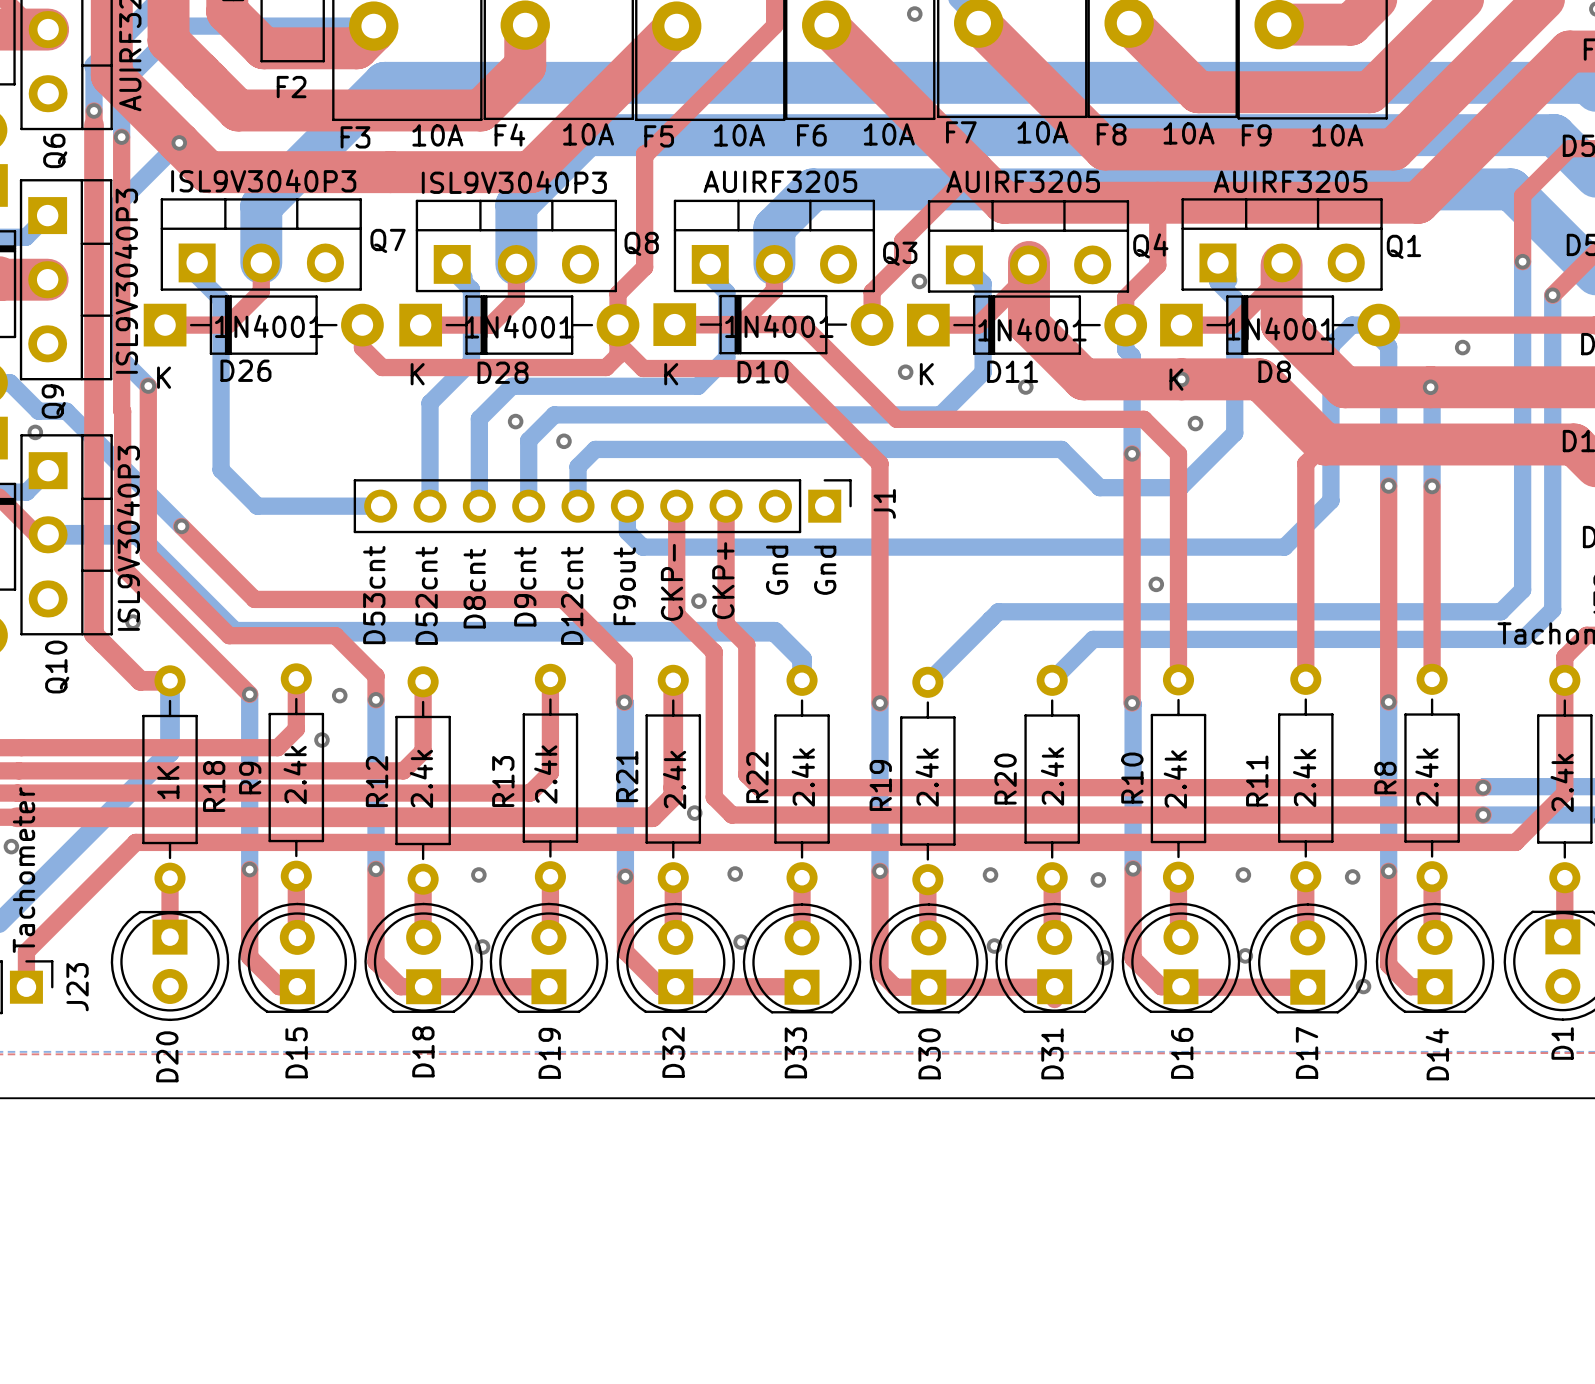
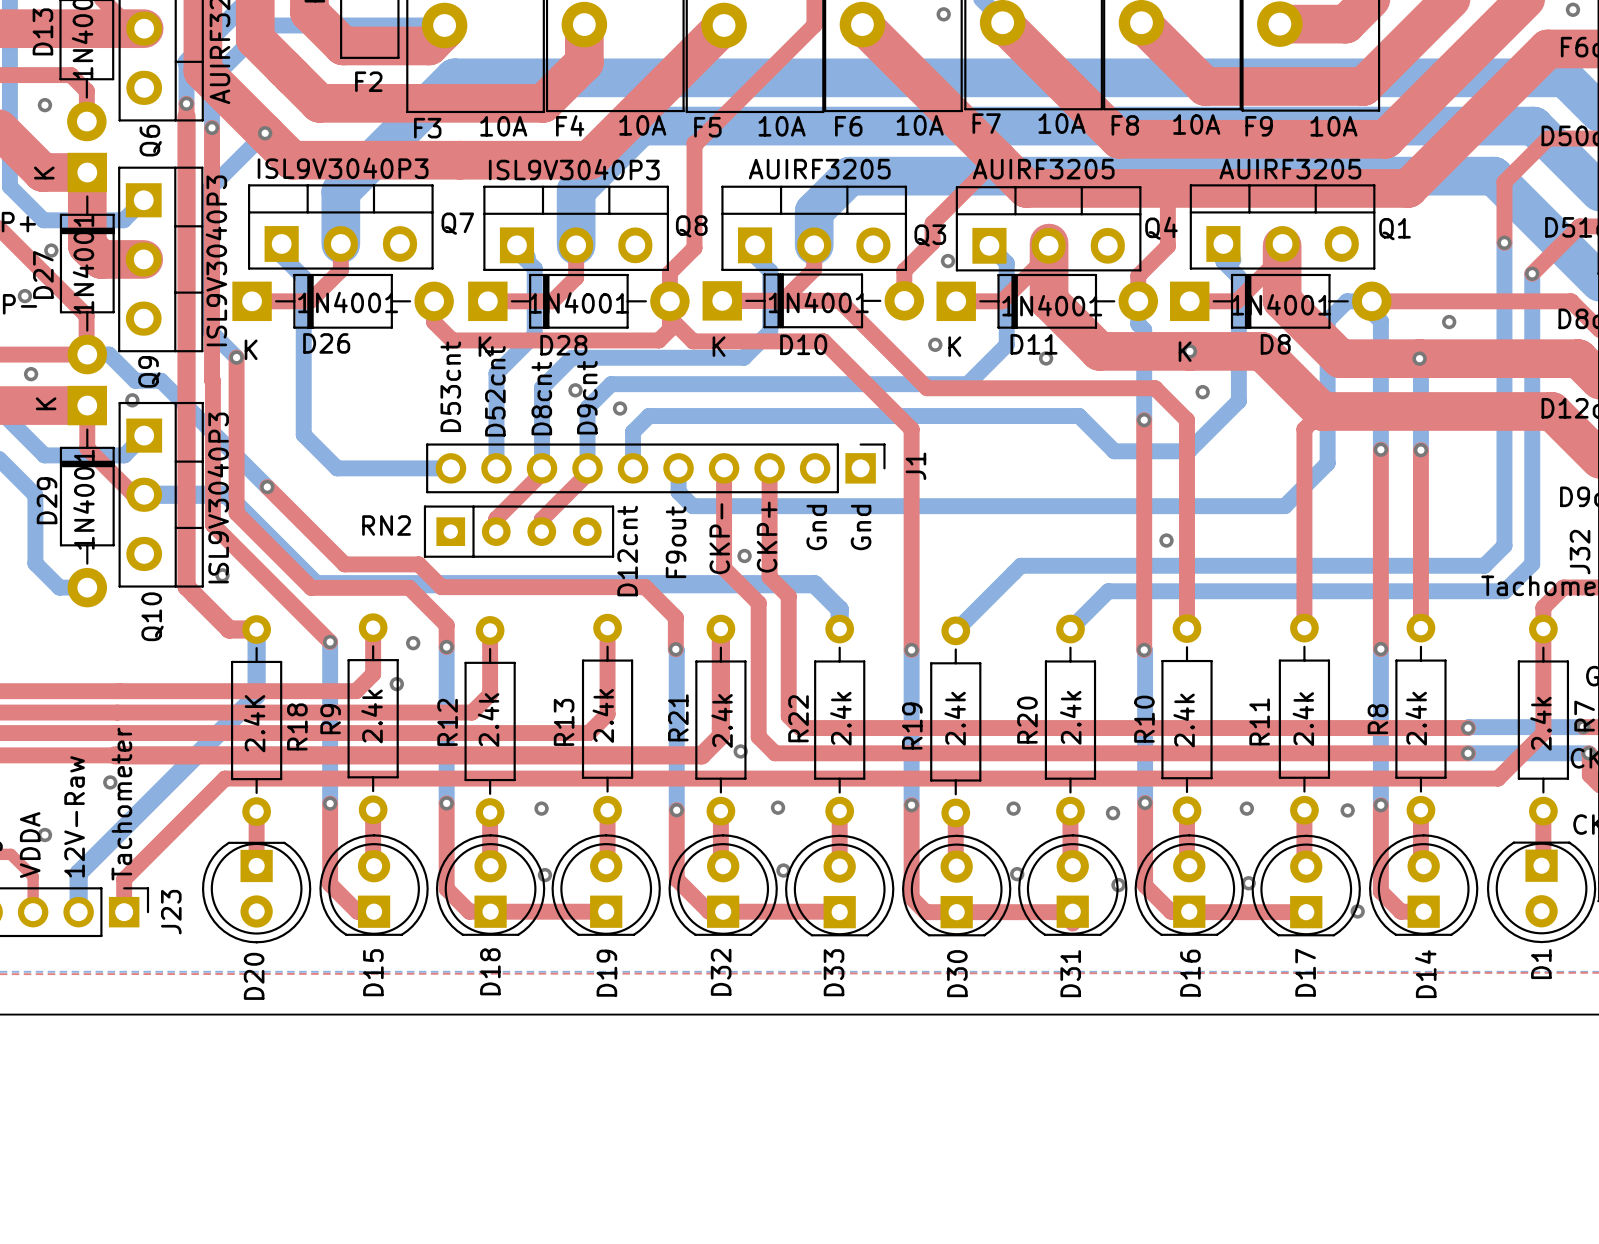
top track: none -> (542, 468) (542, 473) (496, 518) (496, 531)
top track: none -> (587, 468) (587, 473) (541, 519) (541, 531)
RN2: none -> (519, 531)
text position: D9cnt (525, 586) -> D9cnt (587, 397)
text position: D8cnt (474, 588) -> D8cnt (541, 398)
text position: D53cnt (374, 595) -> D53cnt (450, 386)
text position: D52cnt (426, 595) -> D52cnt (495, 391)
top track: (254, 599) (562, 599) (624, 660) (624, 668) -> (334, 554) (344, 564) (418, 564) (441, 587) (645, 587) (675, 617)
R18 value: 1K (168, 782) -> 2.4K (254, 723)

